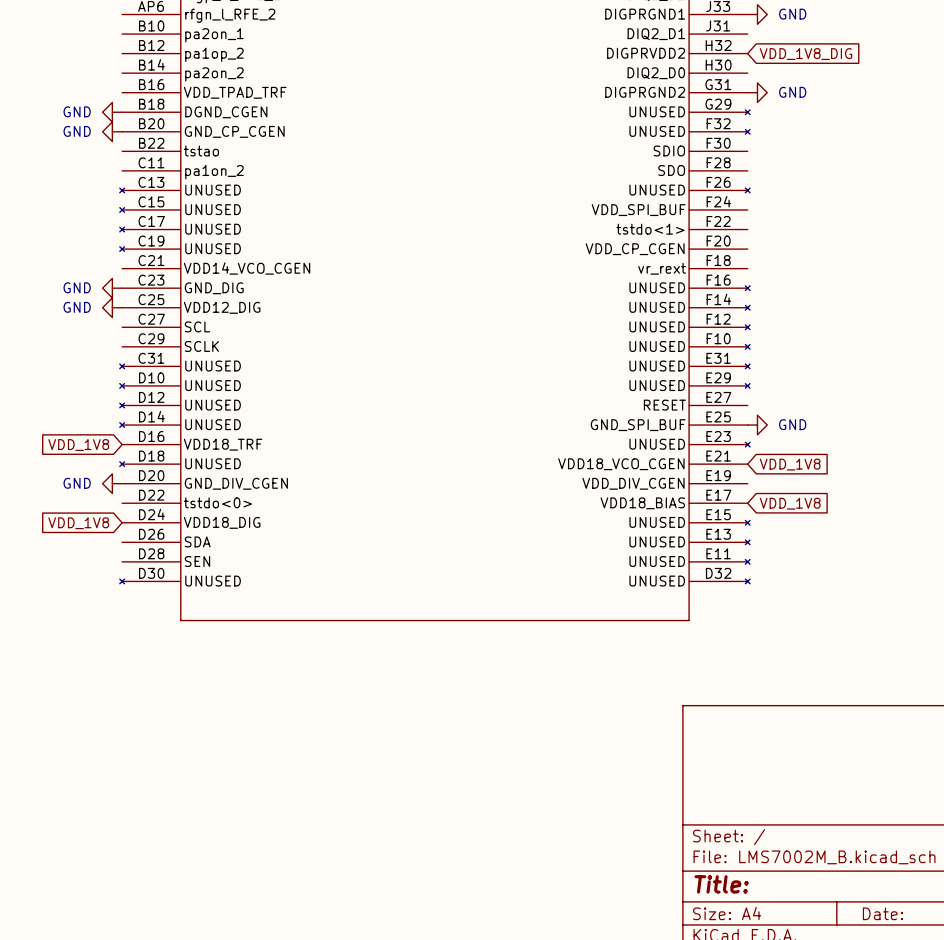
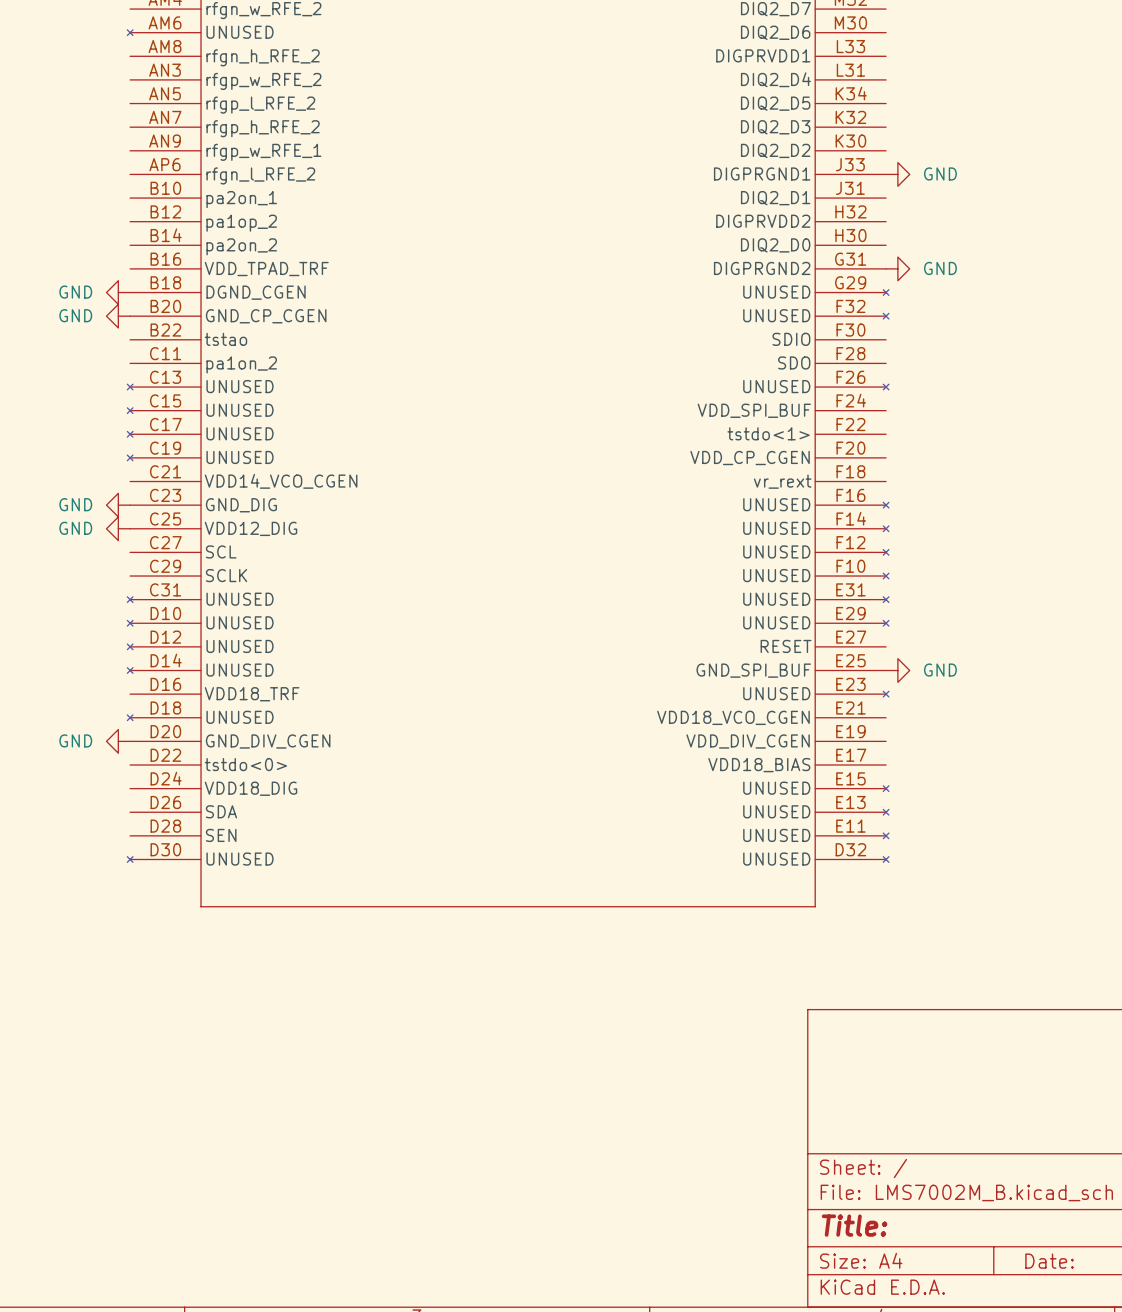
global label: VDD_1V8_DIG (806, 54) -> none
global label: VDD_1V8 (78, 445) -> none
global label: VDD_1V8 (790, 464) -> none
global label: VDD_1V8 (790, 503) -> none
global label: VDD_1V8 (78, 523) -> none

